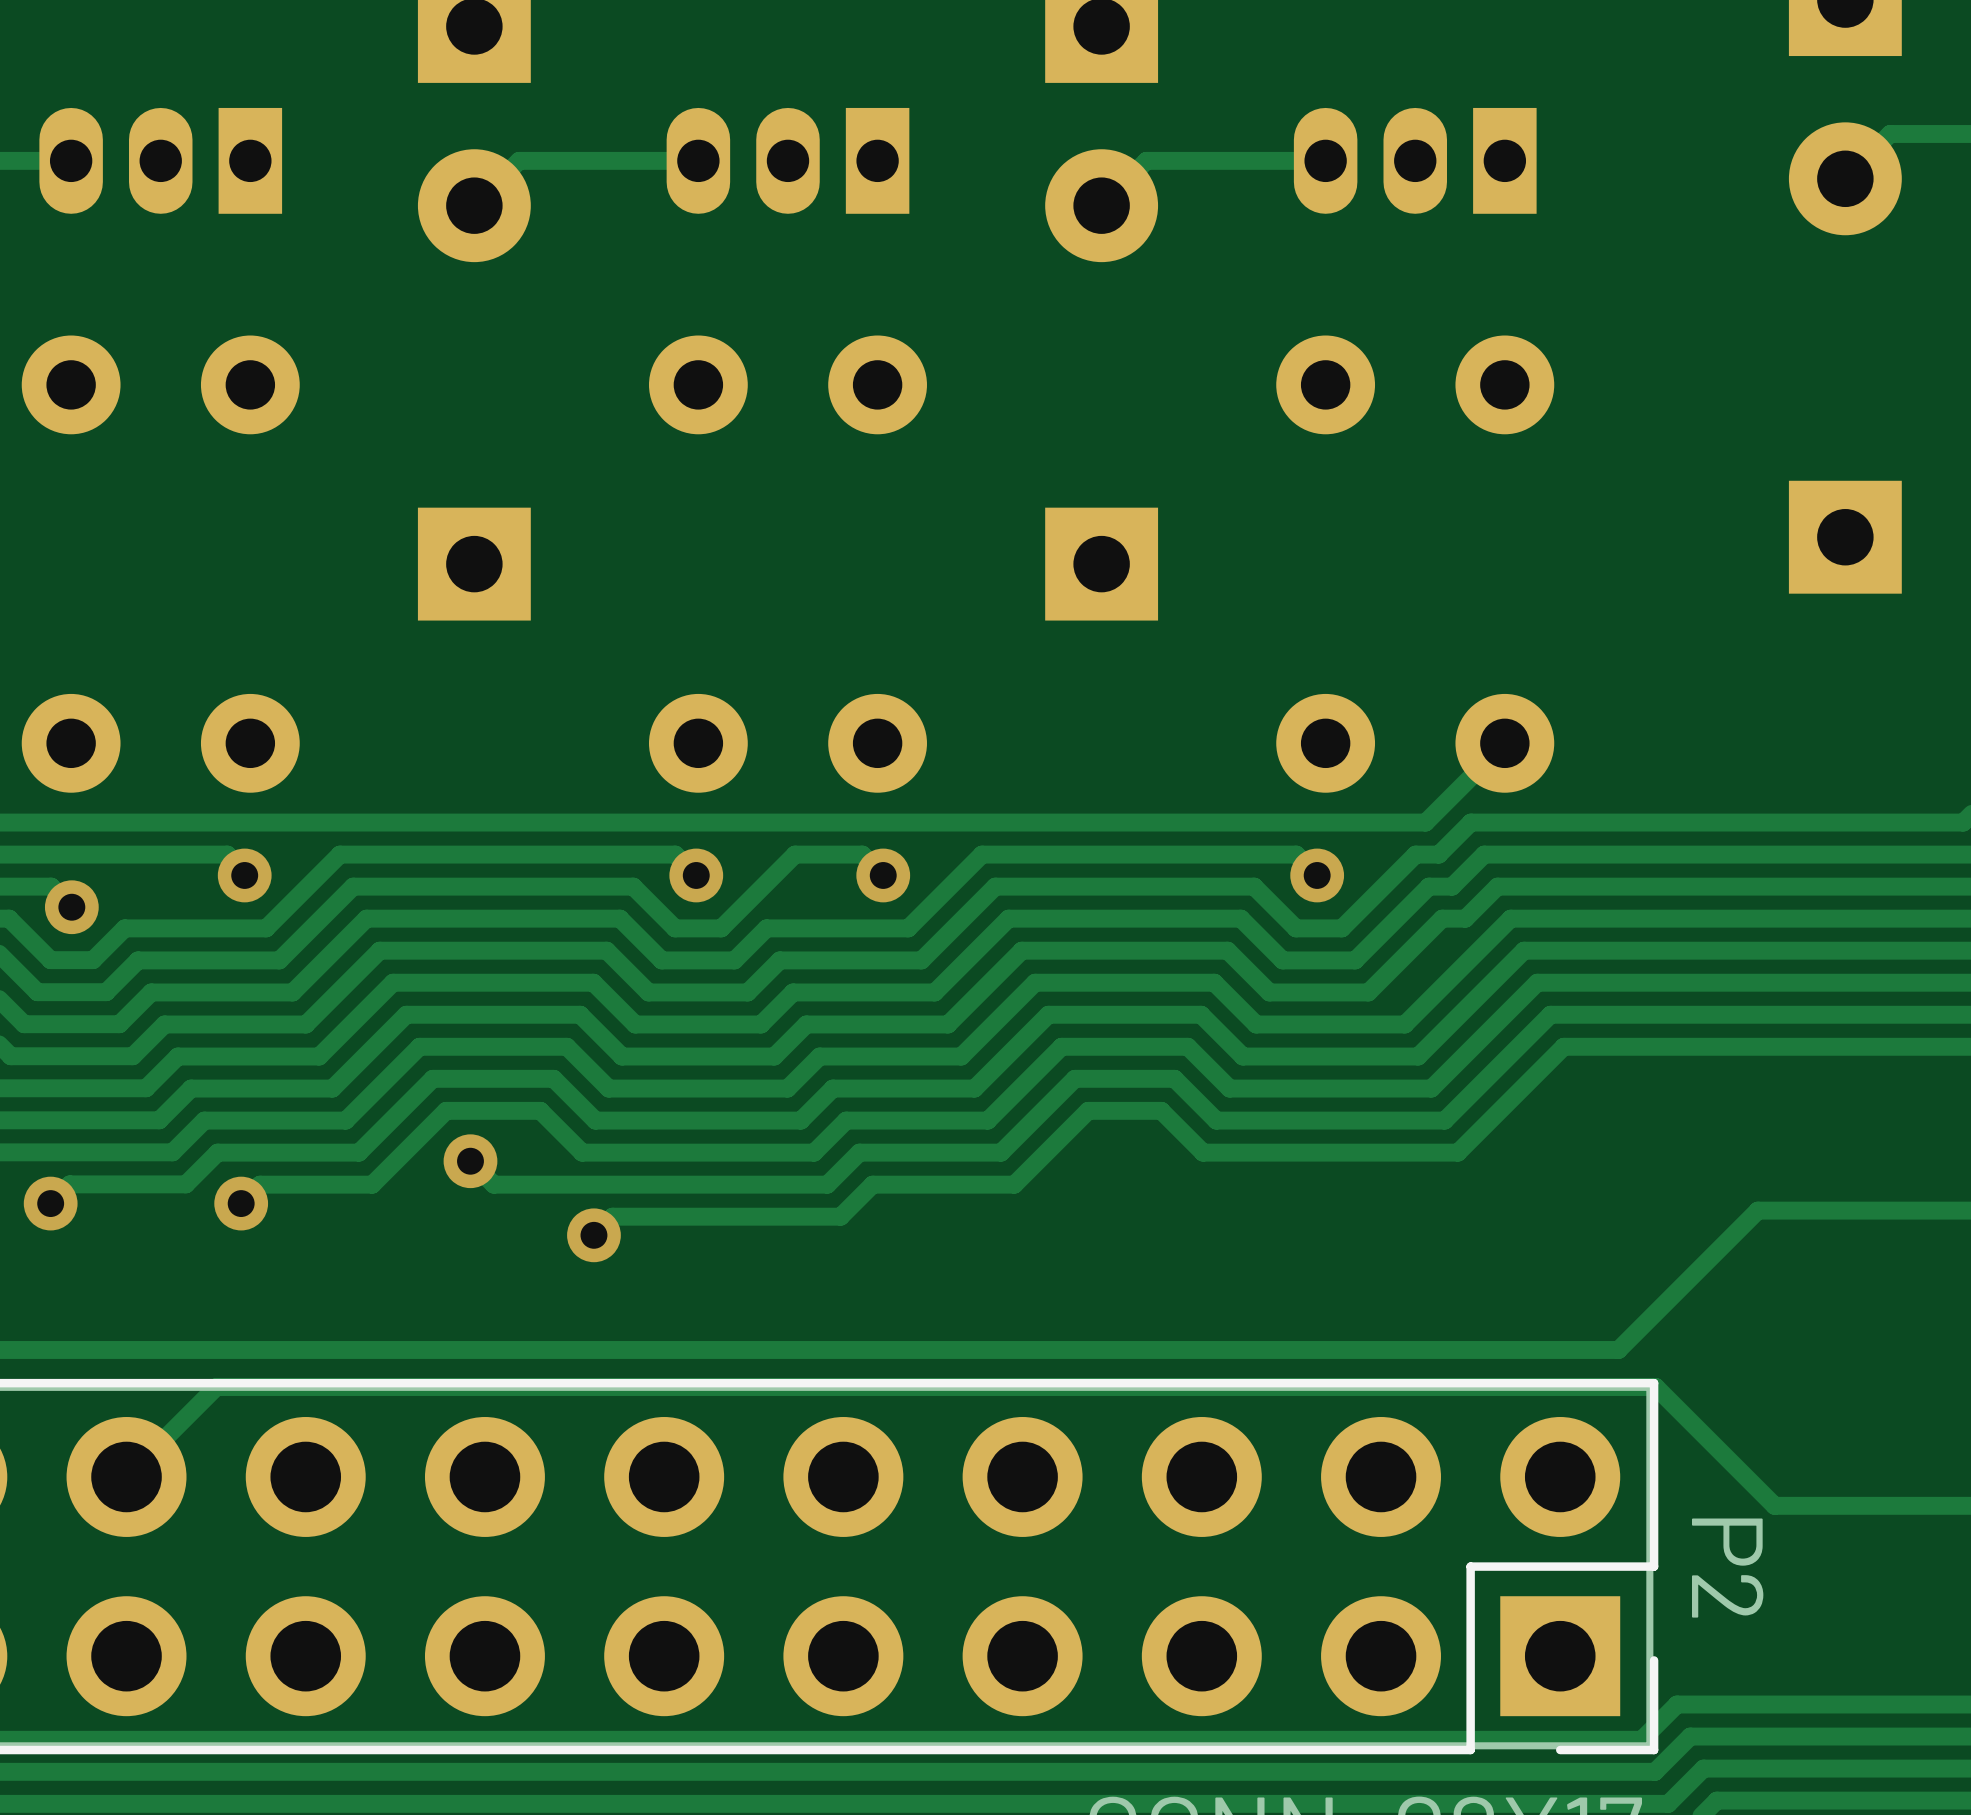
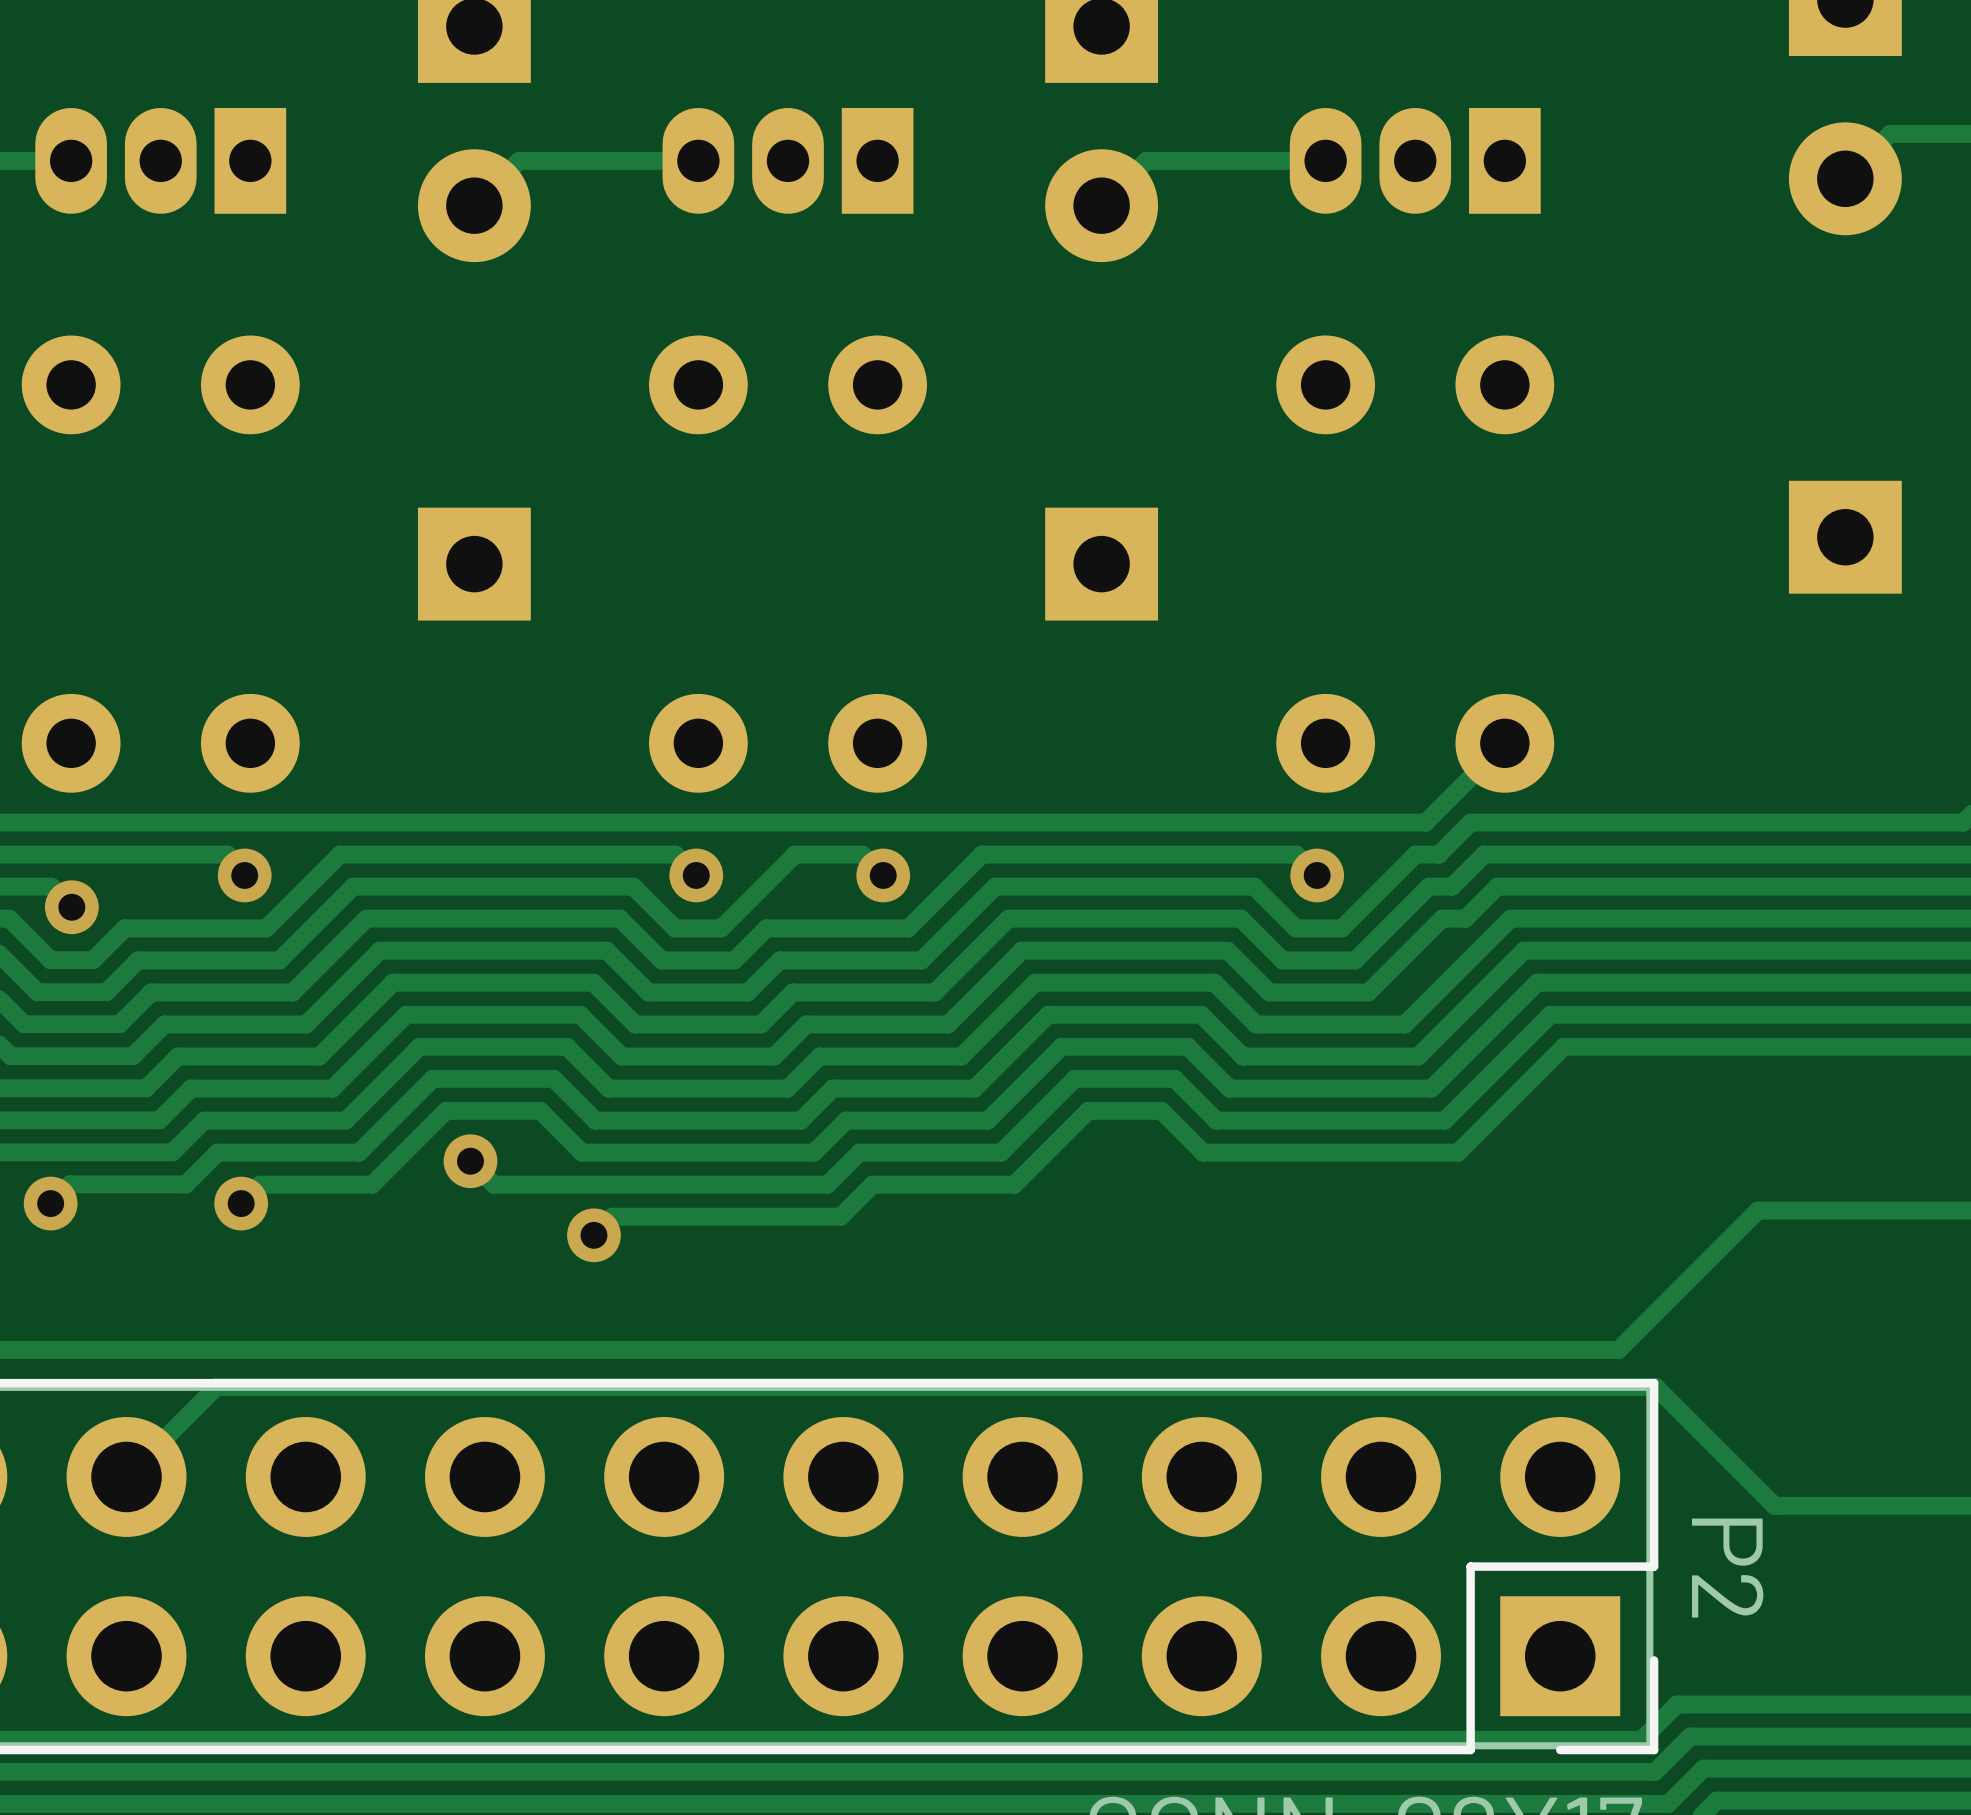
part footprint: [39, 107, 283, 214] -> [35, 107, 287, 214]
part footprint: [666, 107, 910, 214] -> [662, 107, 914, 214]
part footprint: [1293, 107, 1537, 214] -> [1289, 107, 1541, 214]

